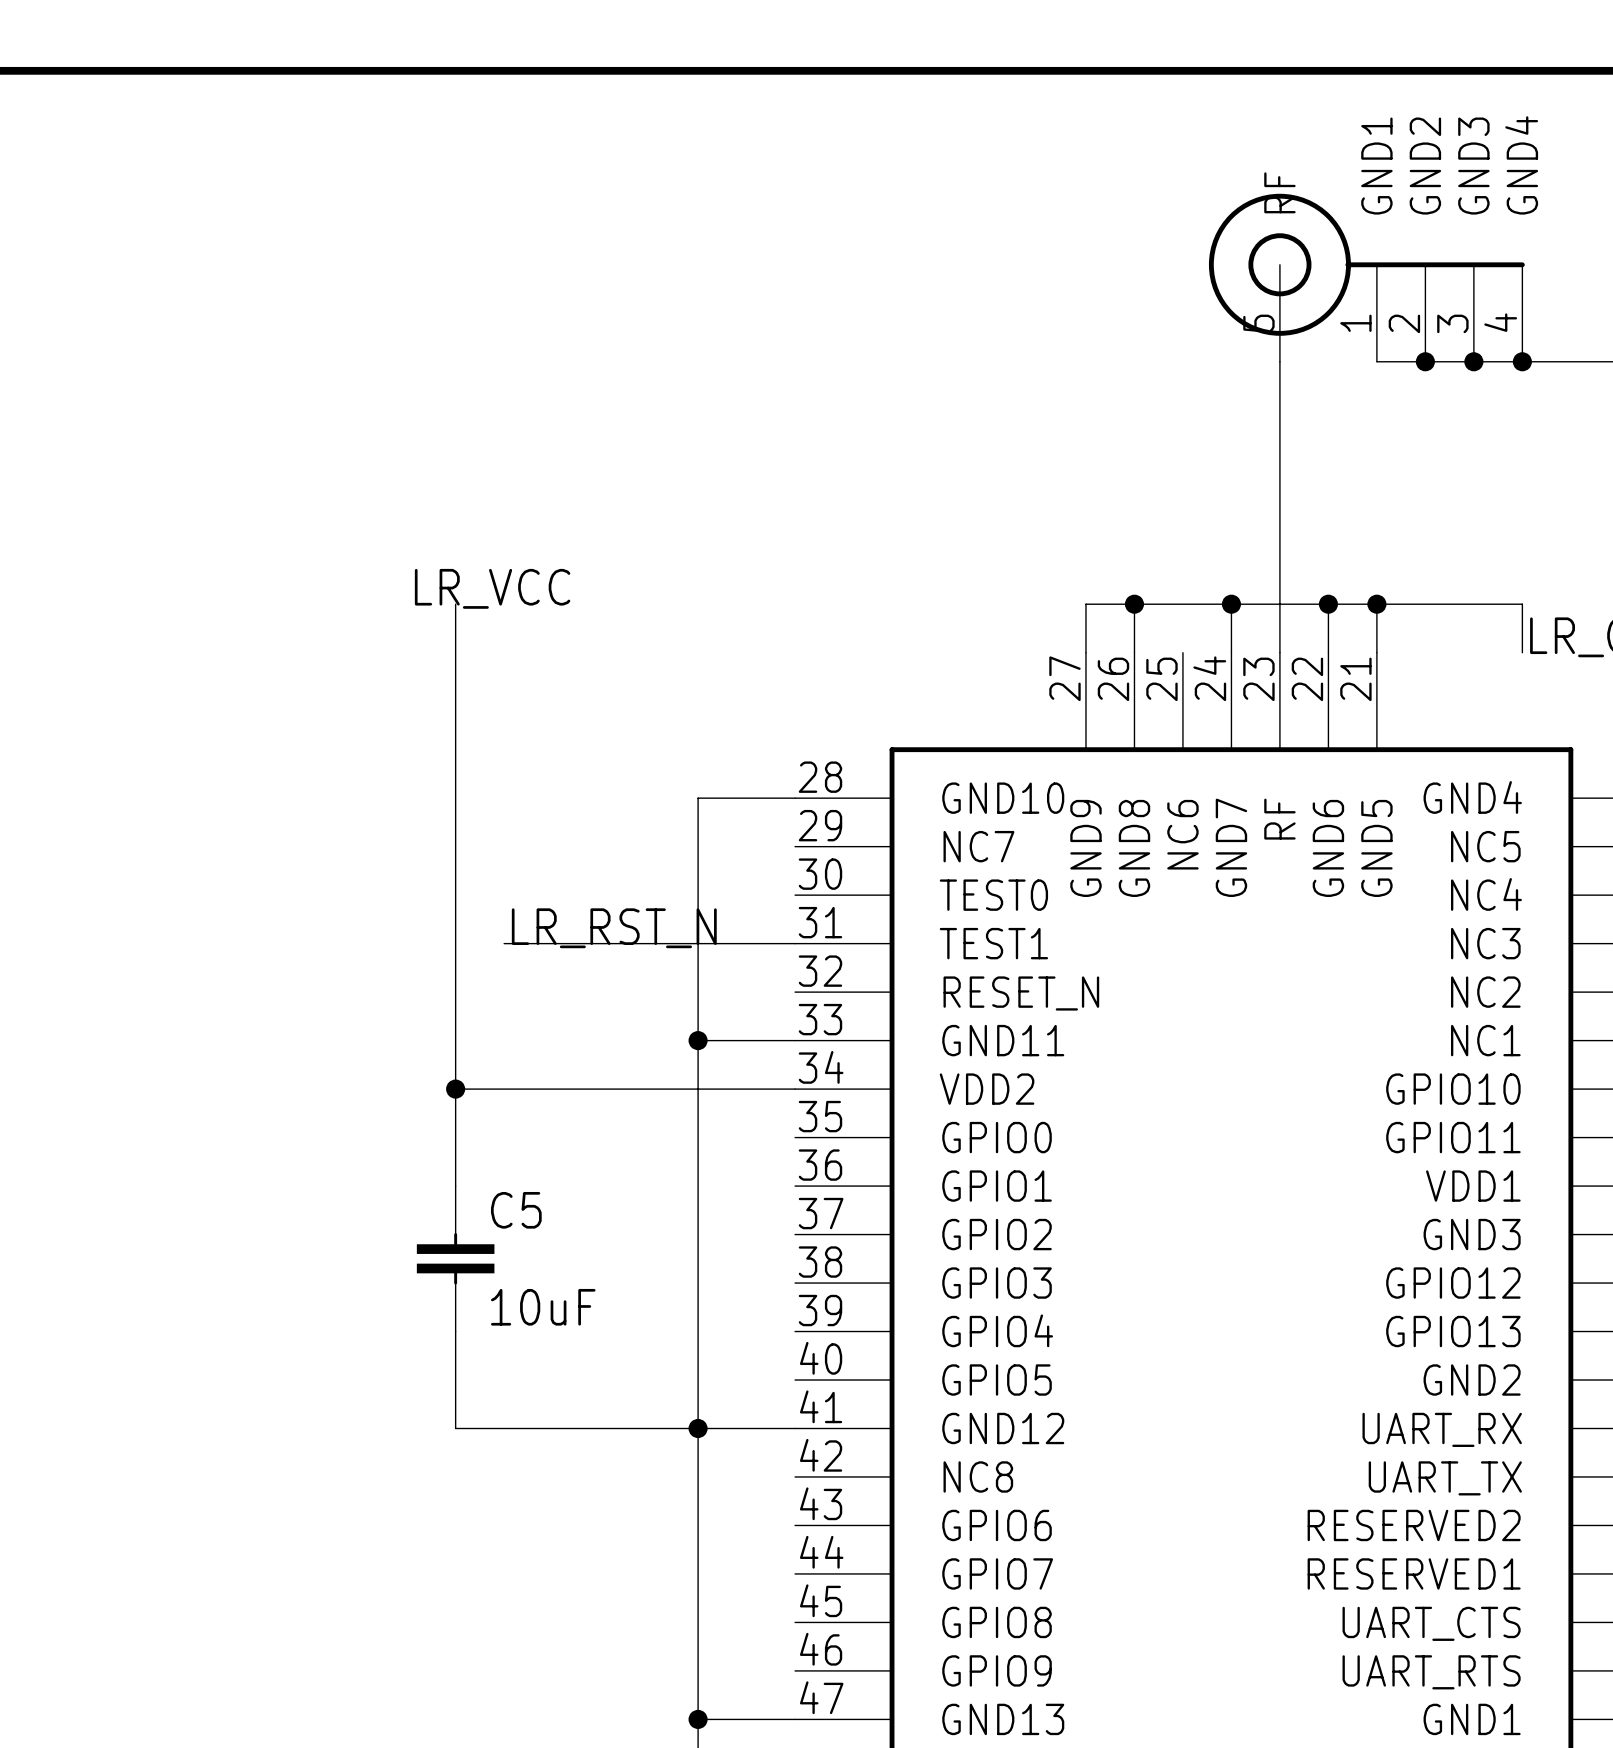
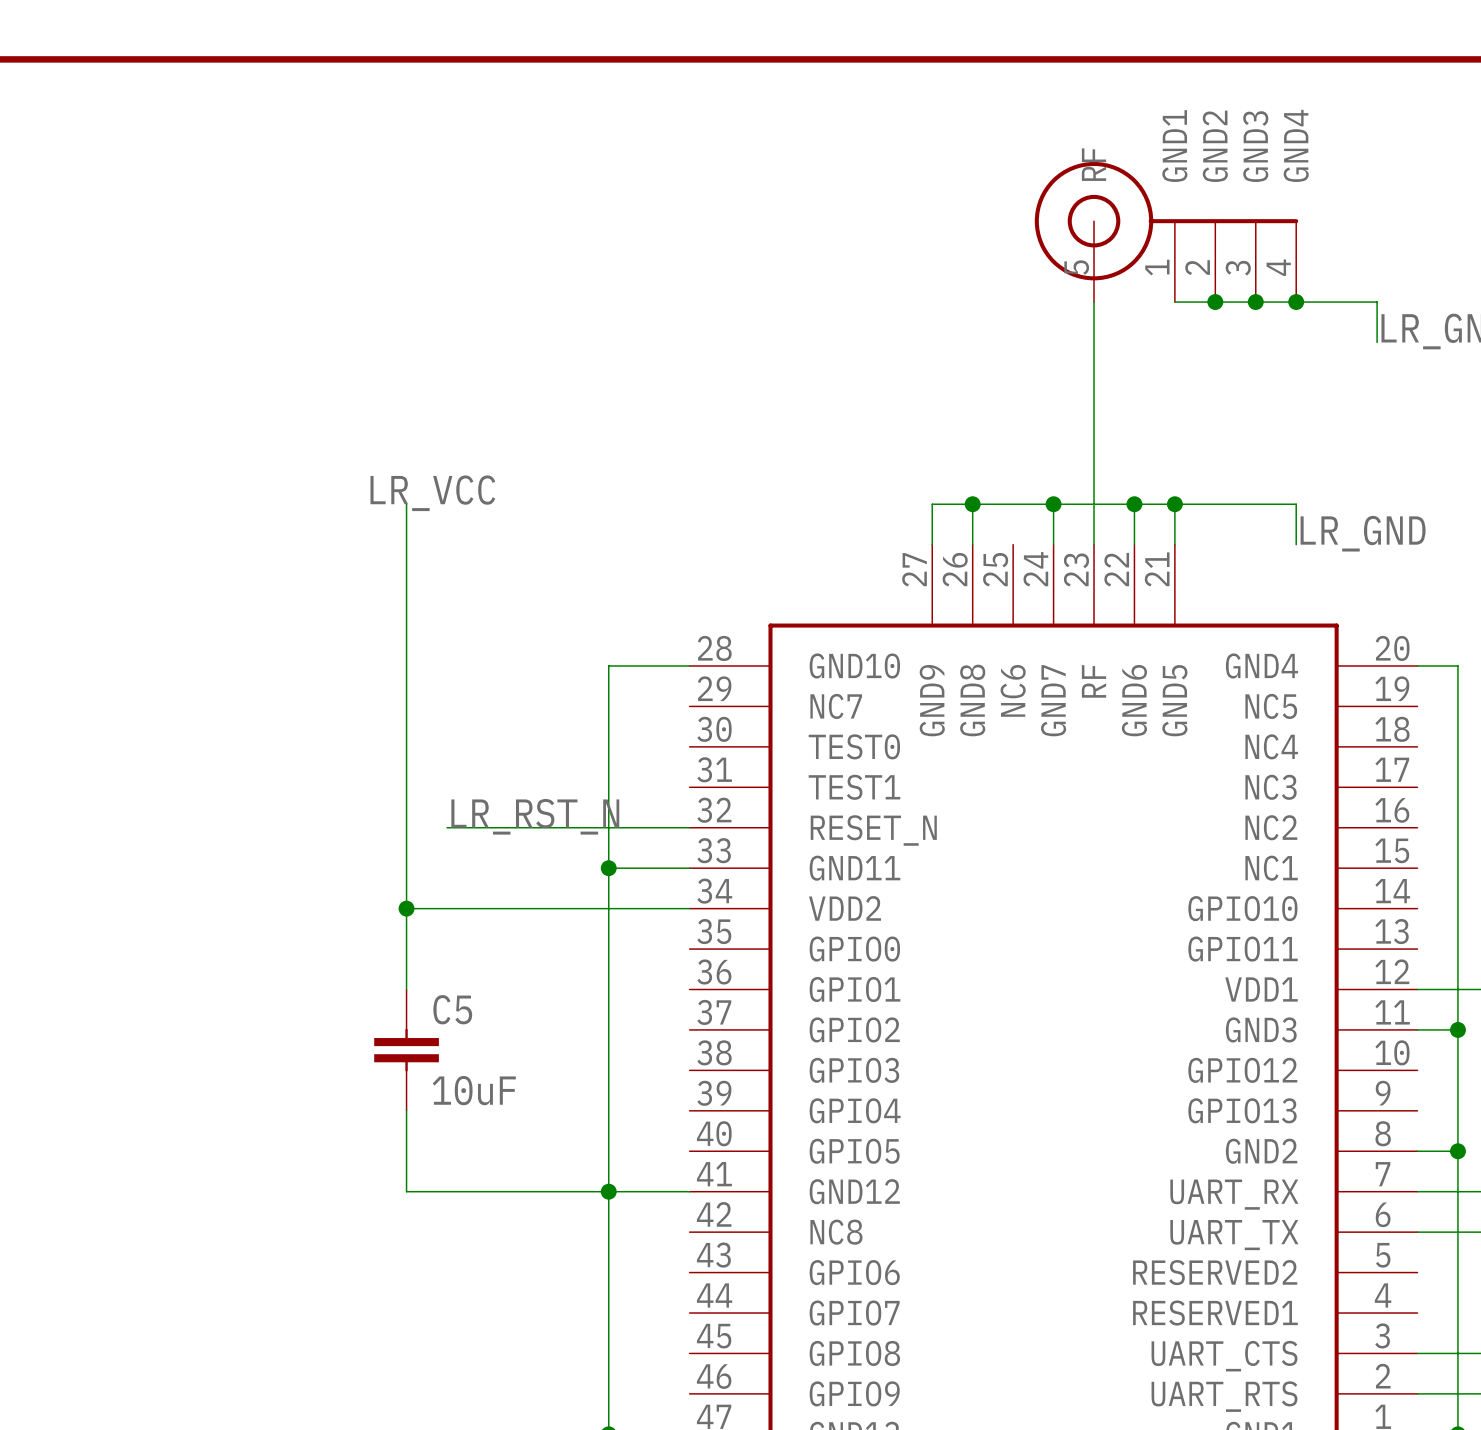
label position: LR_RST_N (614, 928) -> LR_RST_N (535, 816)
wire: (504, 943) (795, 943) -> (446, 827) (689, 827)

